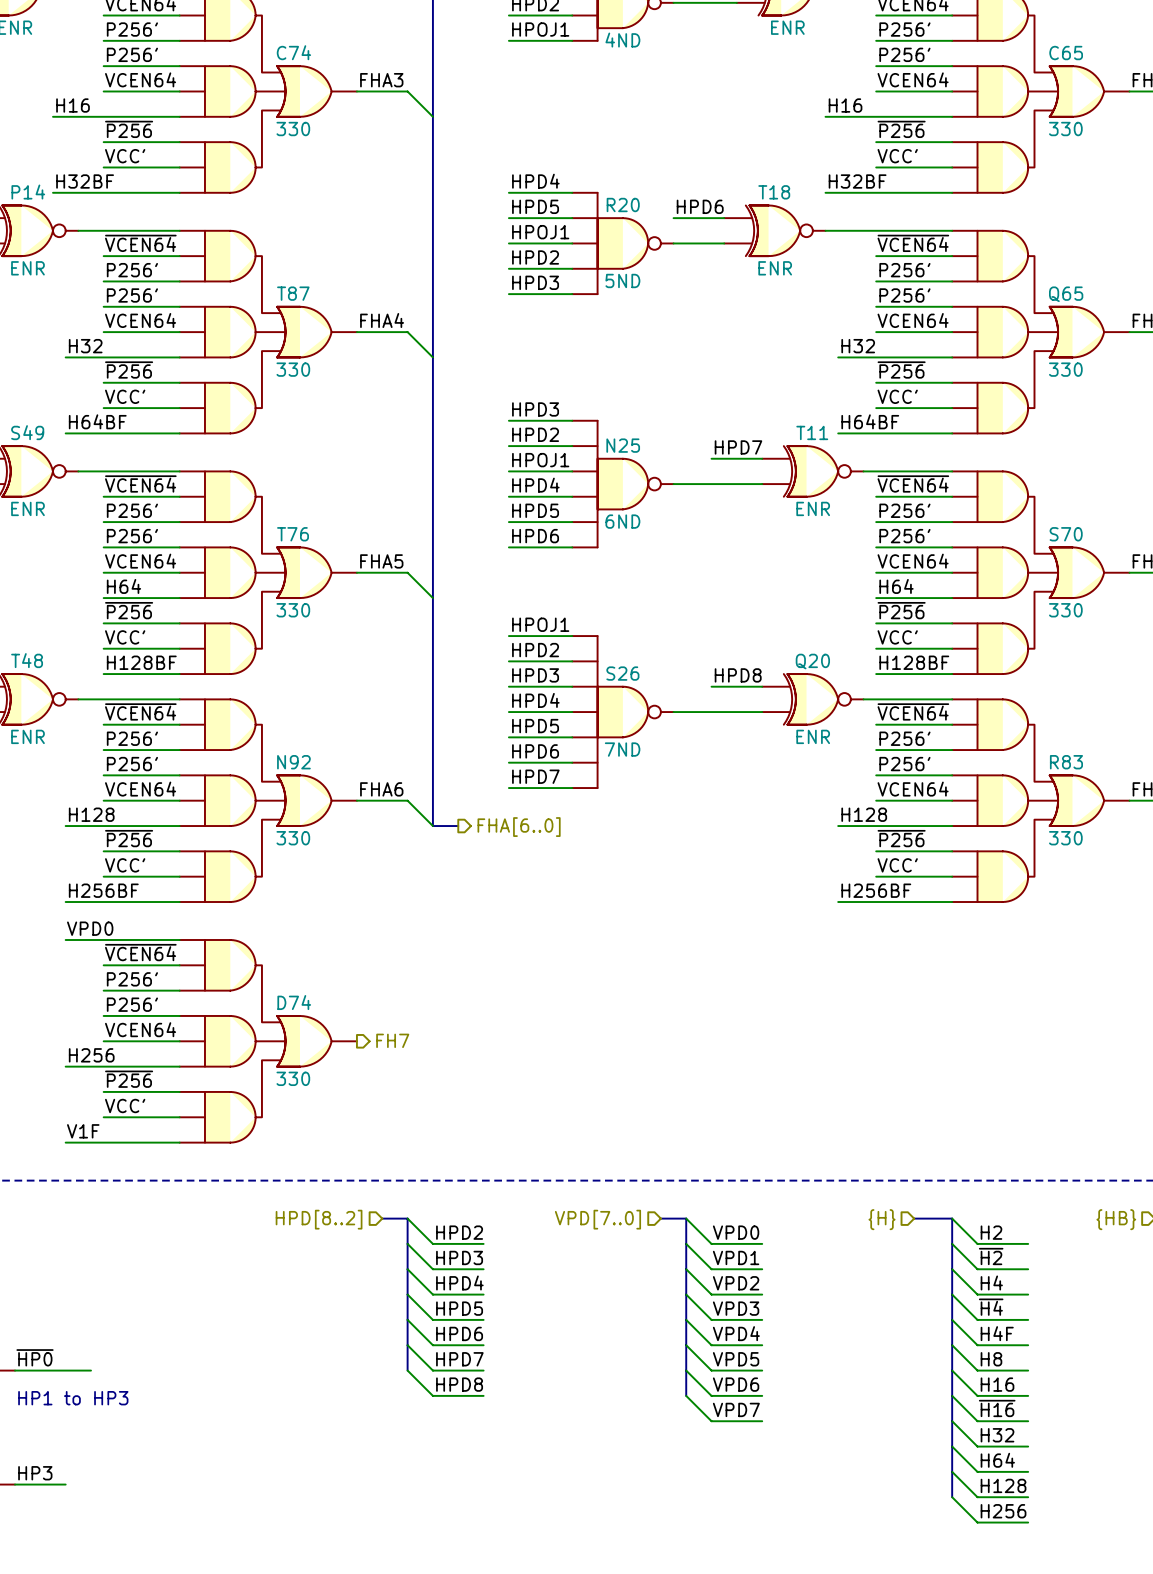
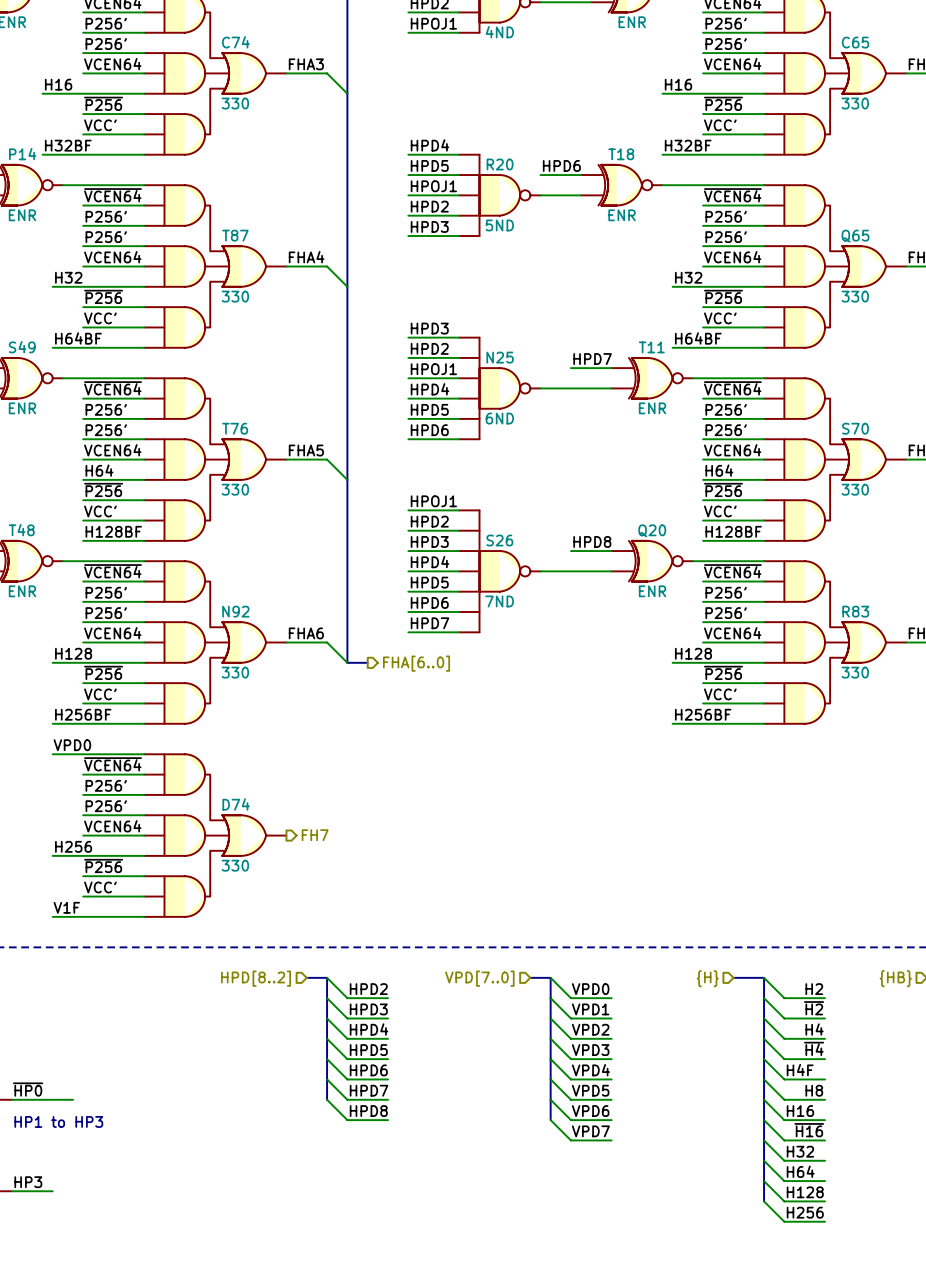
label position: H2 (991, 1232) -> H2 (814, 989)
label position: ~{H2} (991, 1256) -> ~{H2} (814, 1008)
label position: H4 (991, 1282) -> H4 (814, 1029)
label position: ~{H4} (991, 1307) -> ~{H4} (814, 1048)
label position: H8 (991, 1359) -> H8 (814, 1090)
label position: ~{H16} (997, 1408) -> ~{H16} (809, 1130)

